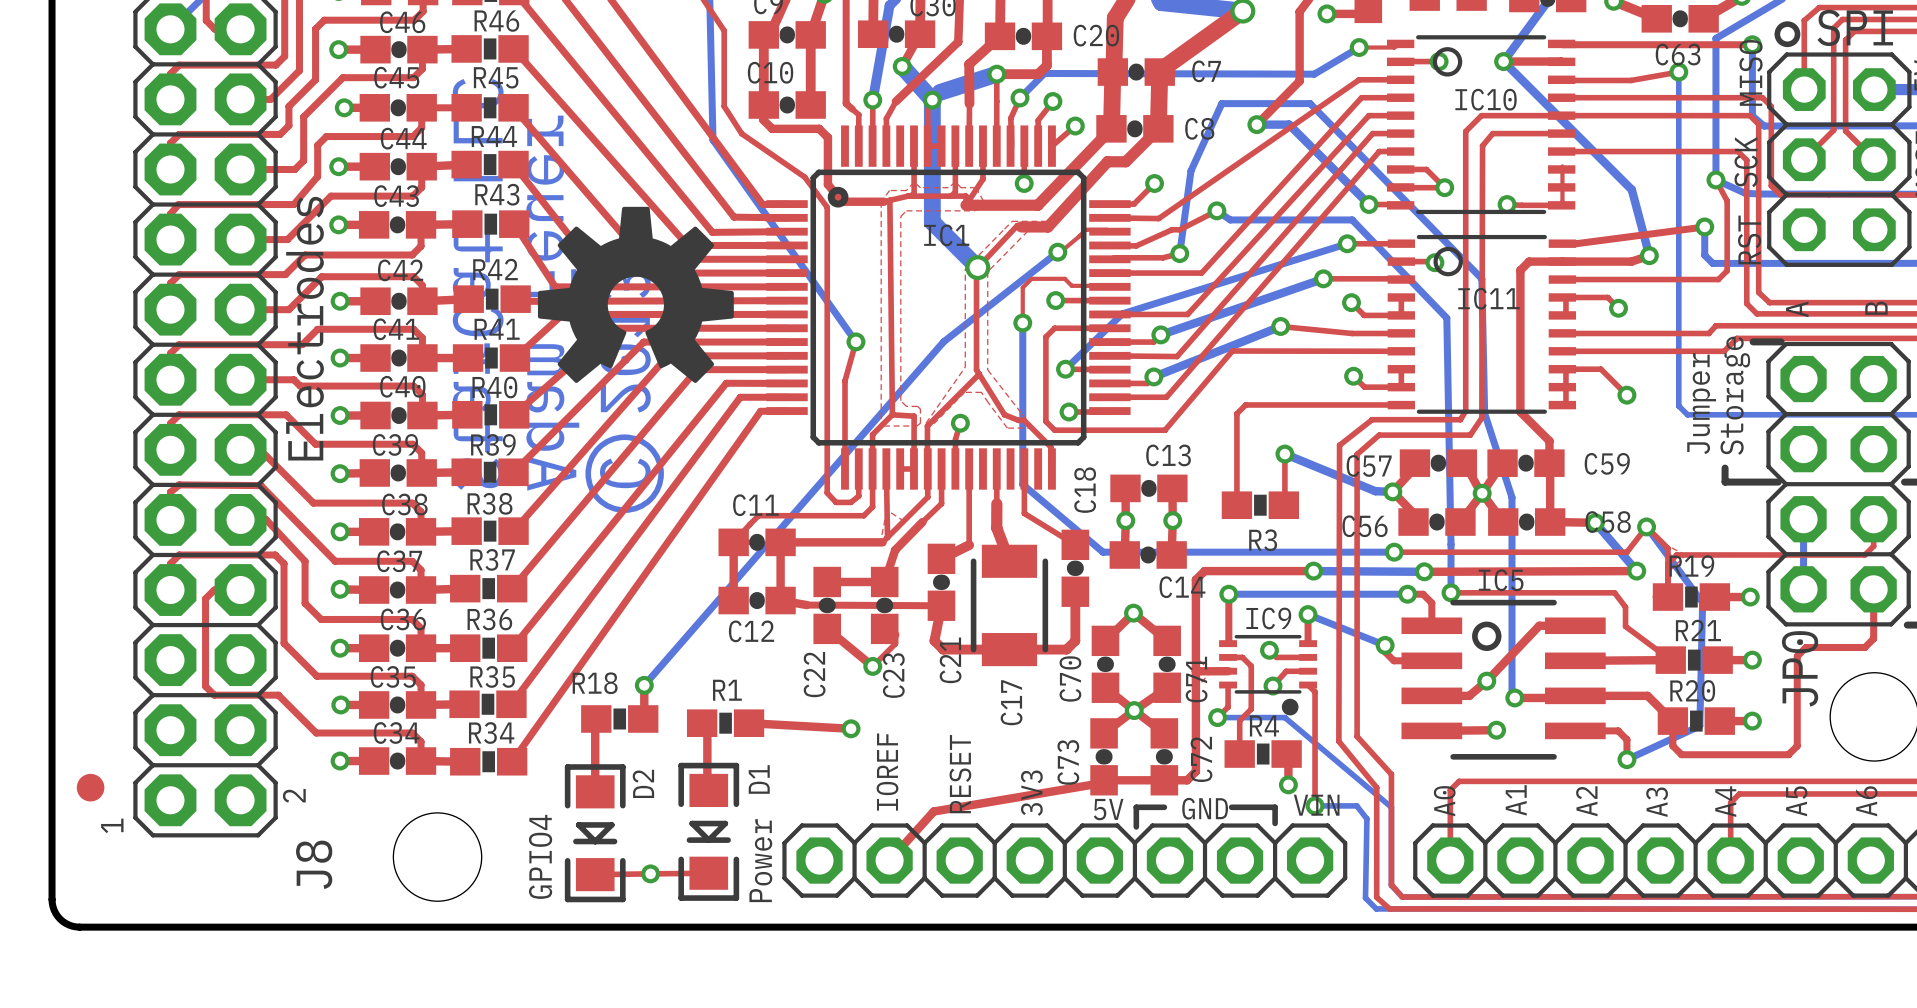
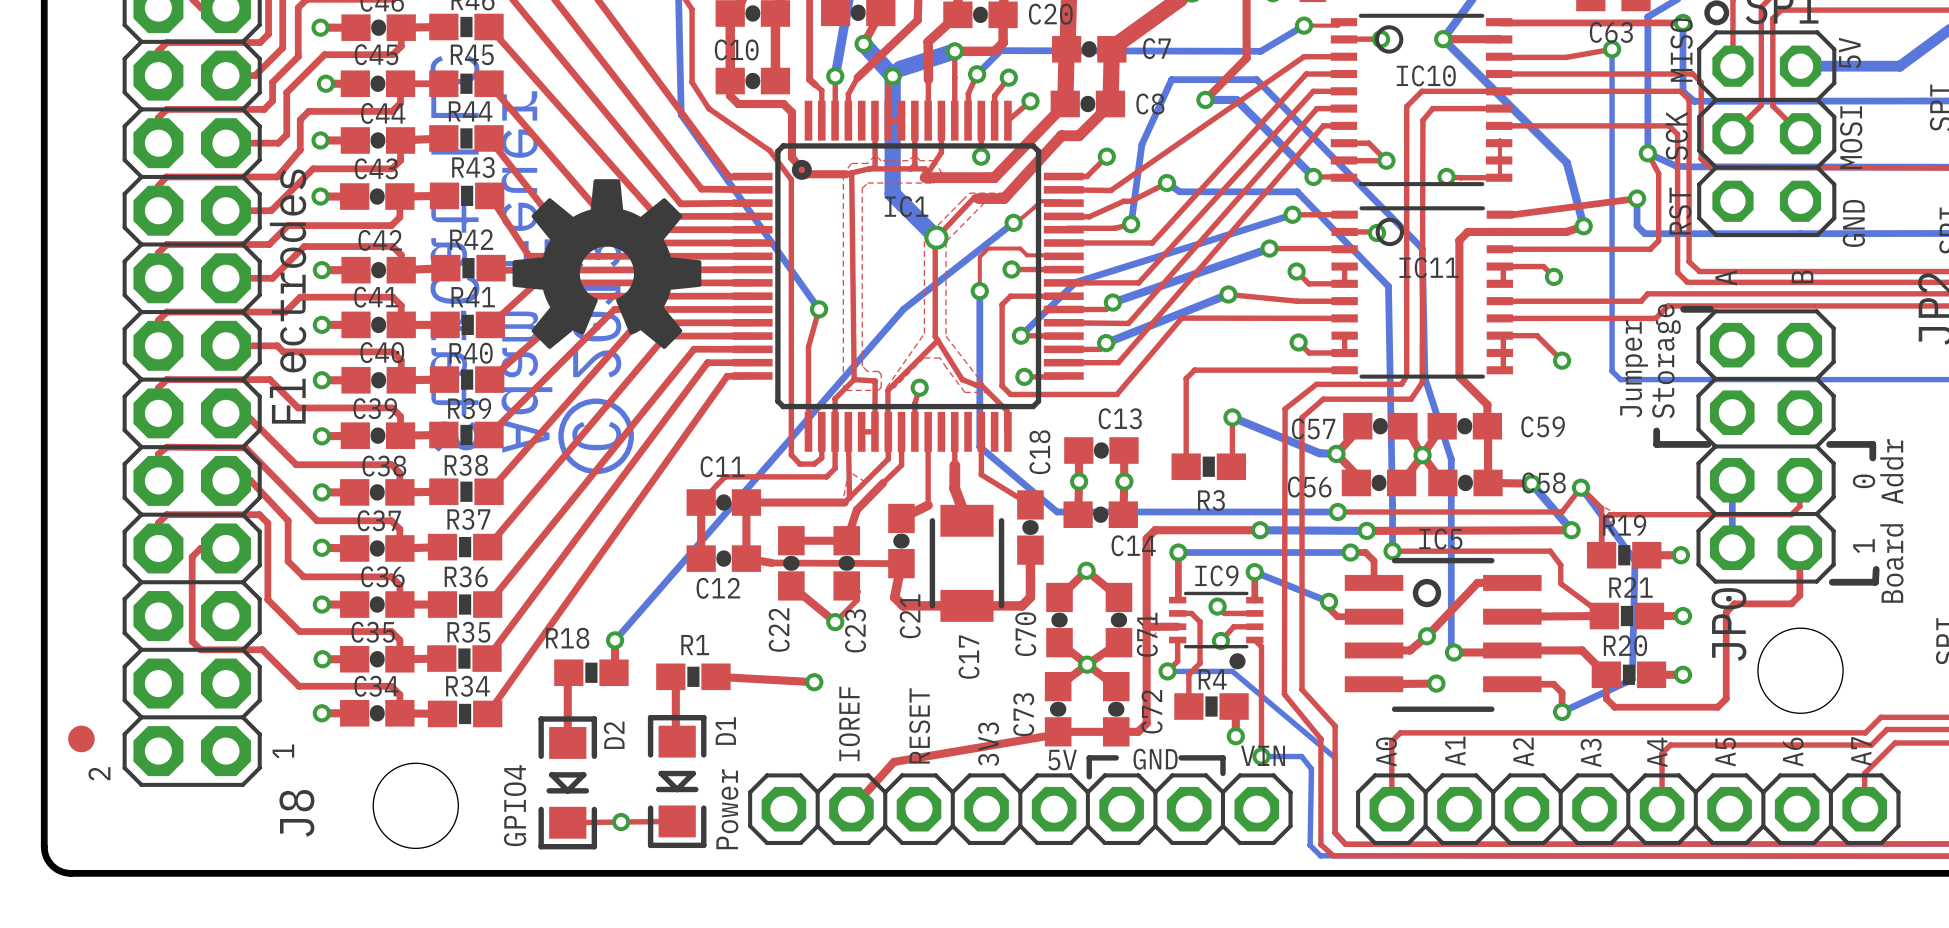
text position: 2 (294, 795) -> 2 (99, 773)
text position: 1 (112, 825) -> 1 (283, 751)

